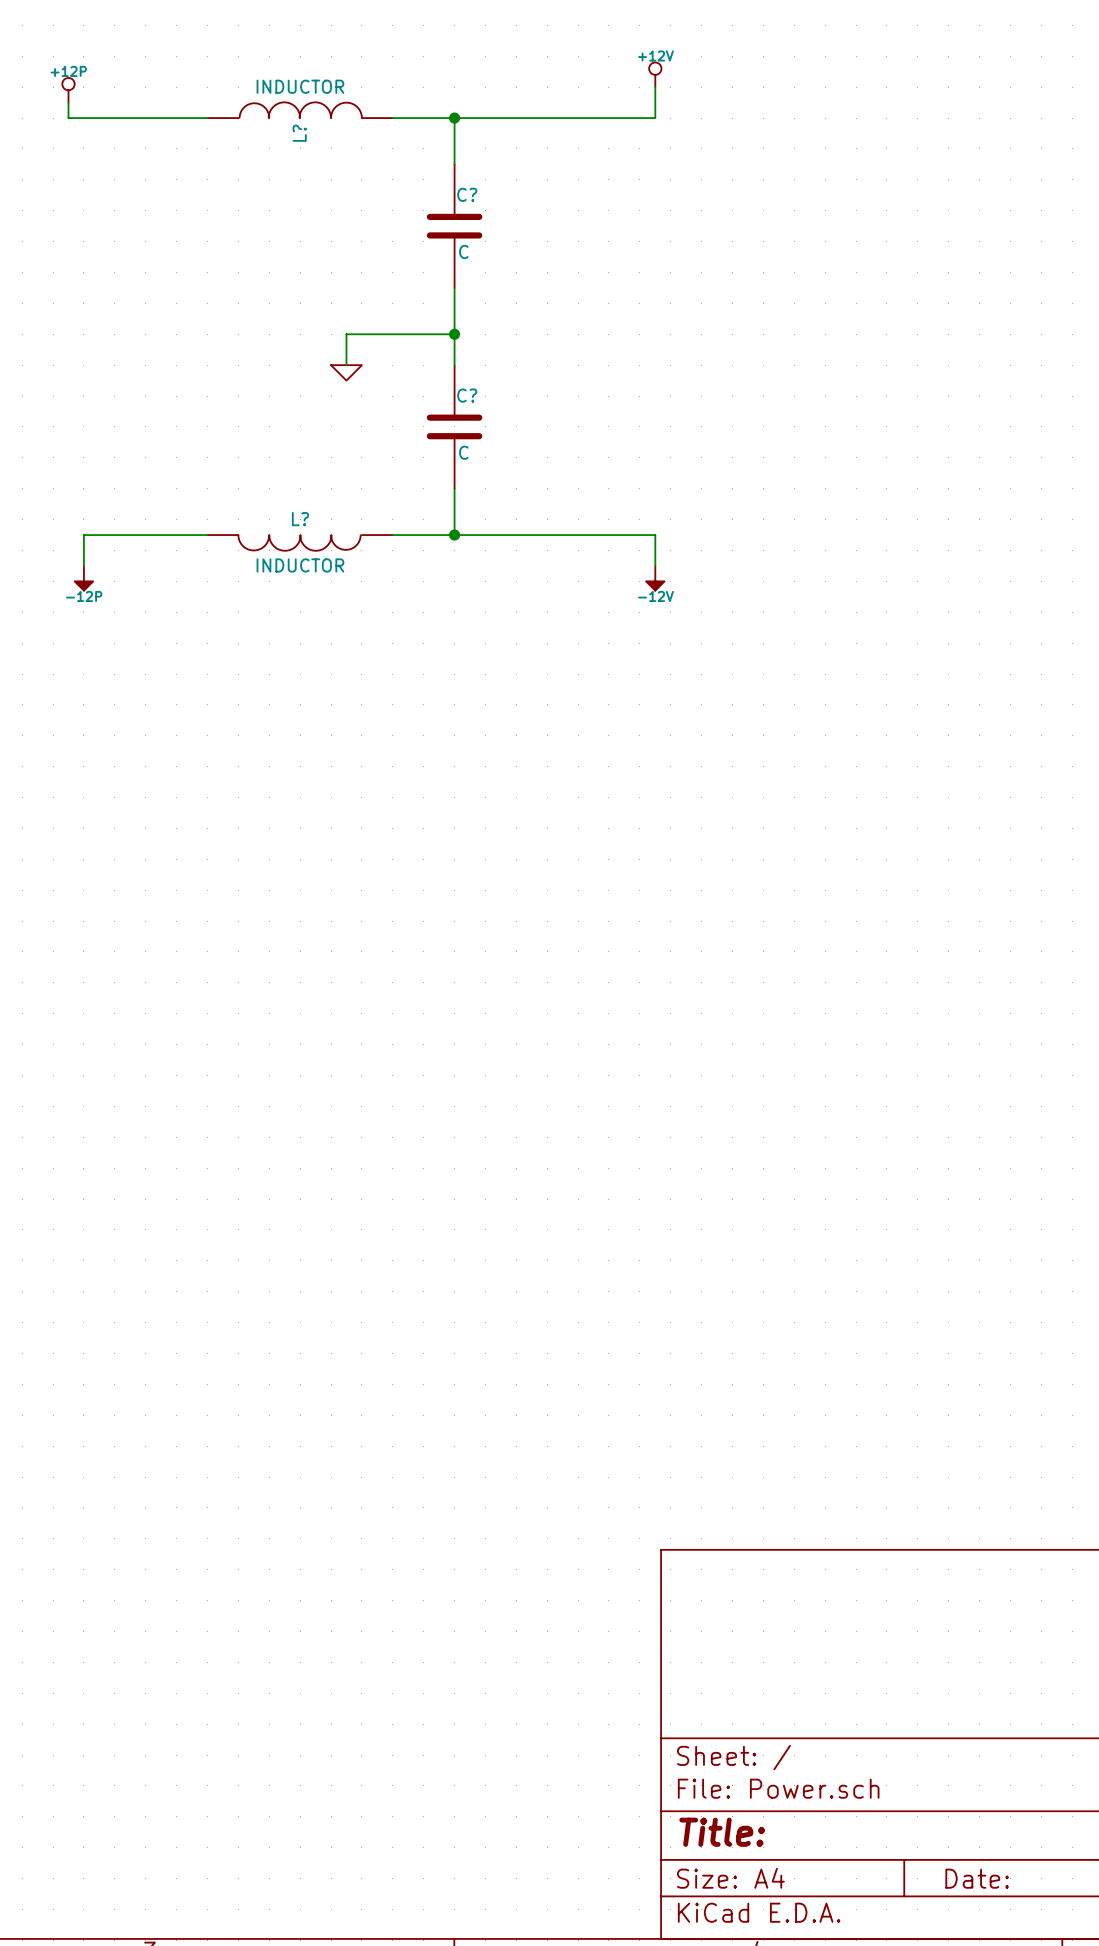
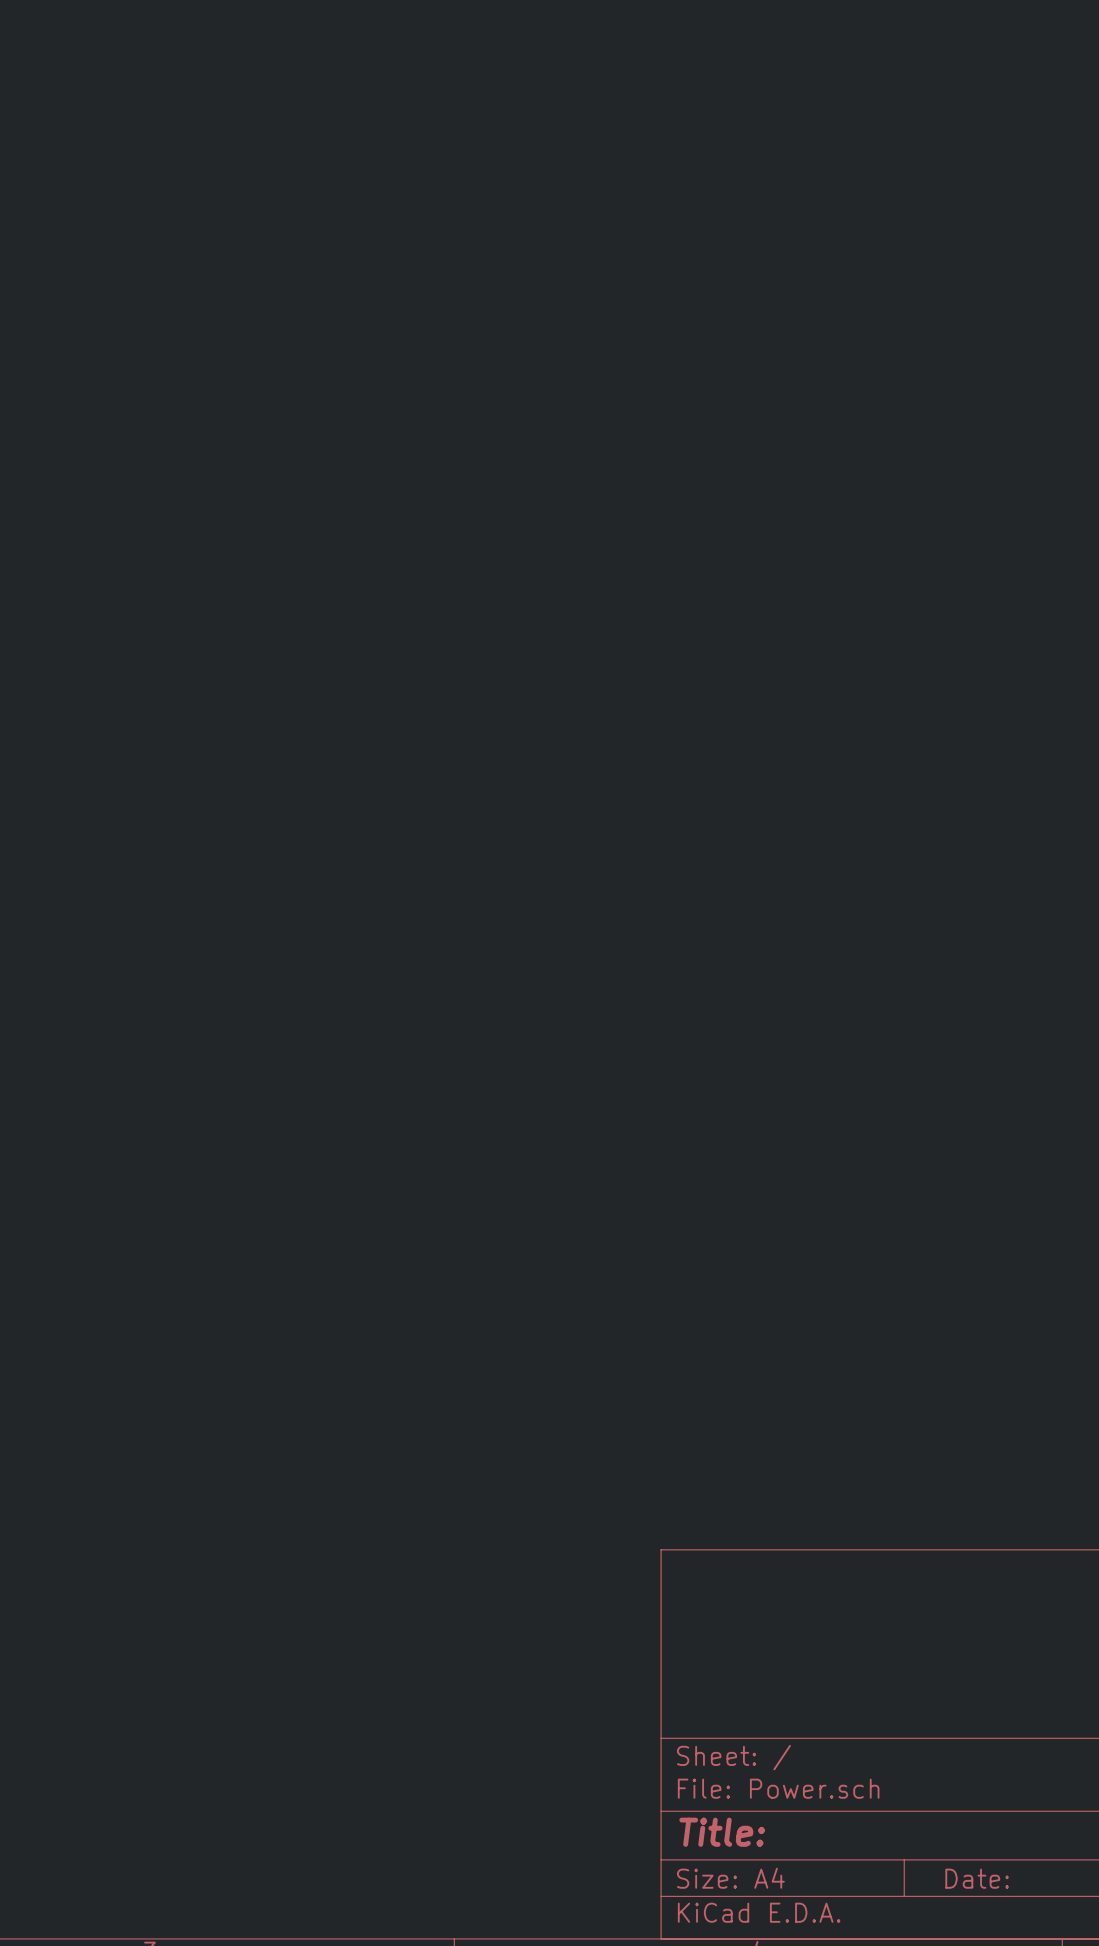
power symbol: +12V (655, 74) -> none
wire: (655, 87) (655, 118) (392, 118) -> none
power symbol: +12P (68, 90) -> none
wire: (68, 102) (68, 118) (207, 118) -> none
L?: INDUCTOR (300, 110) -> none
wire: (454, 118) (454, 164) -> none
junction: (454, 118) -> none
C?: C (454, 226) -> none
wire: (454, 287) (454, 365) -> none
wire: (454, 334) (346, 334) (346, 365) -> none
junction: (454, 334) -> none
power symbol: (346, 372) -> none
C?: C (454, 426) -> none
wire: (454, 488) (454, 535) -> none
wire: (207, 535) (83, 535) (83, 565) -> none
wire: (392, 535) (655, 535) (655, 565) -> none
junction: (454, 535) -> none
L?: INDUCTOR (300, 542) -> none
power symbol: -12P (83, 578) -> none
power symbol: -12V (655, 578) -> none

